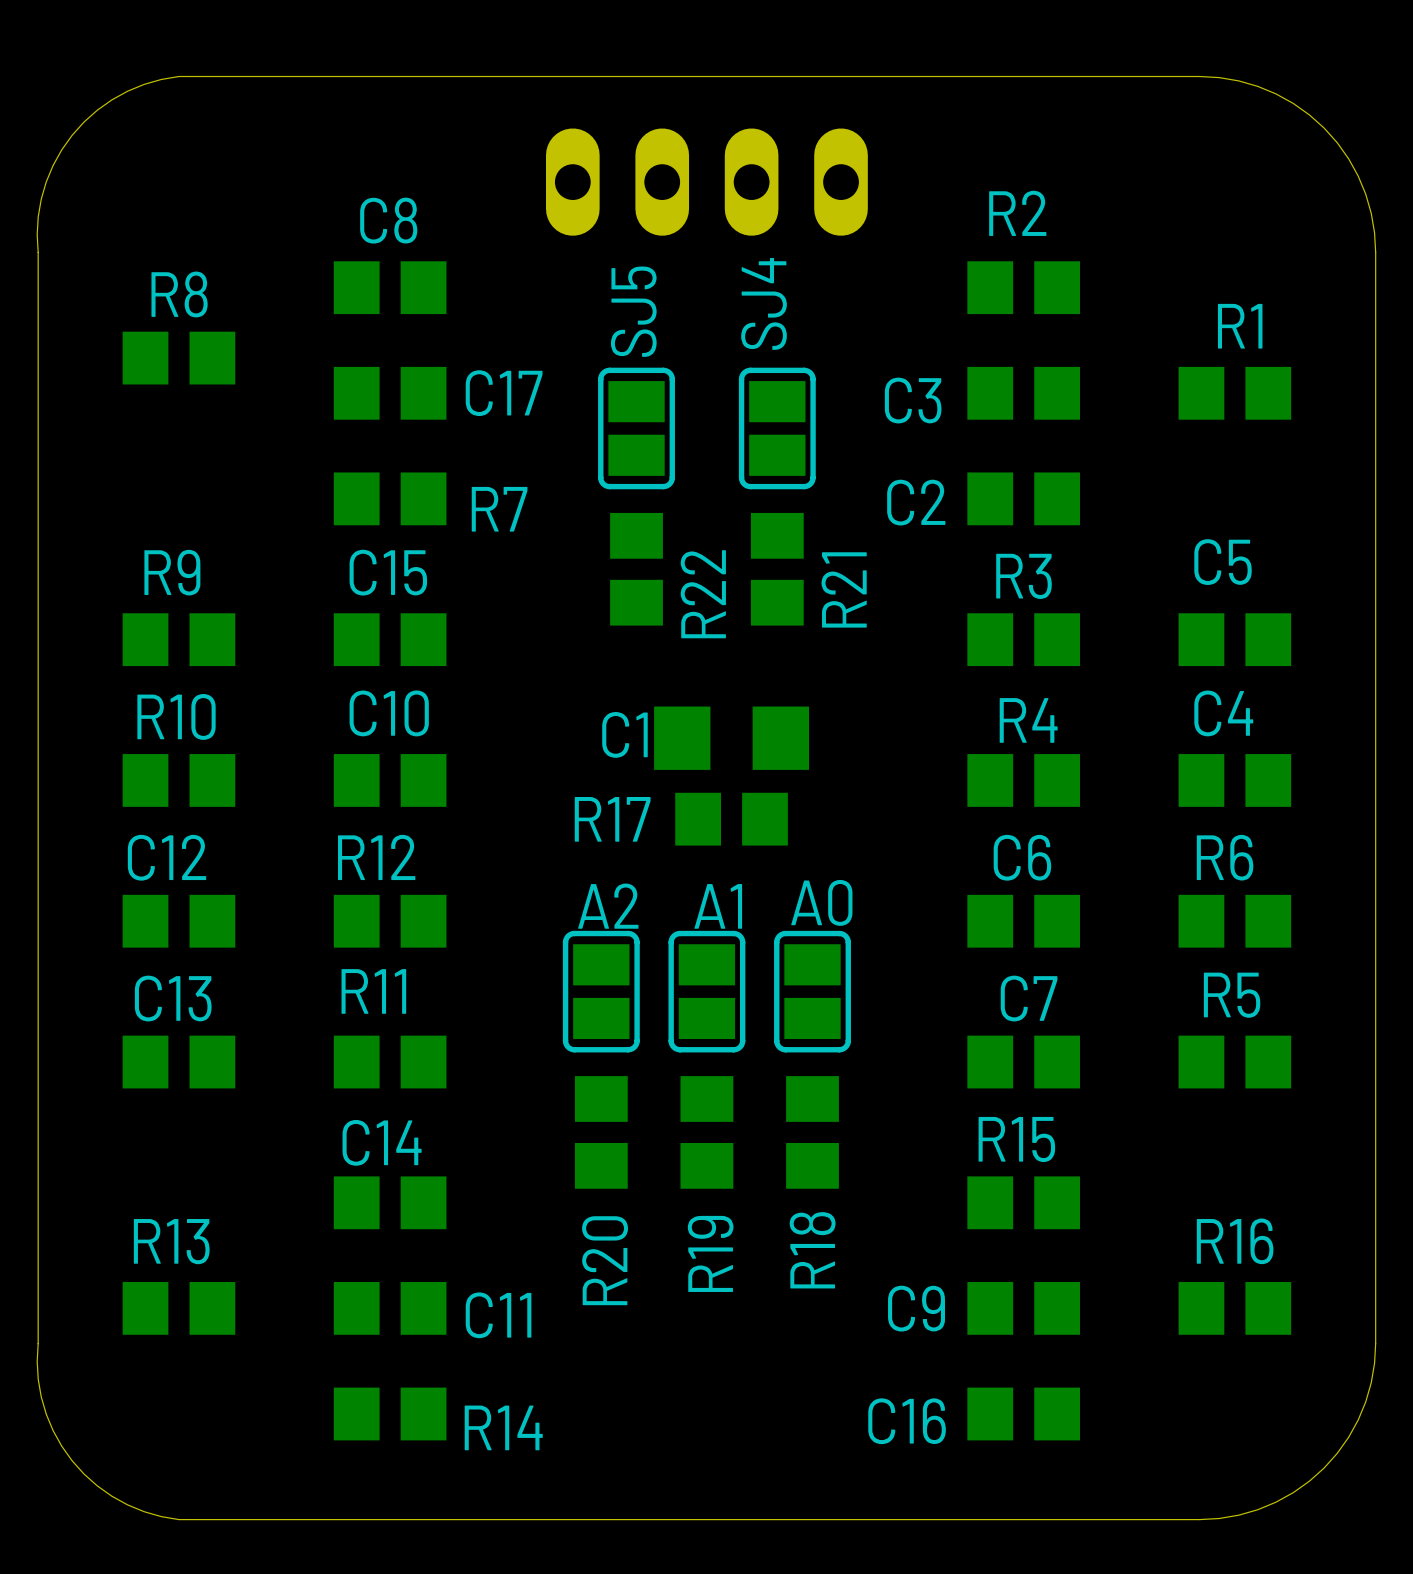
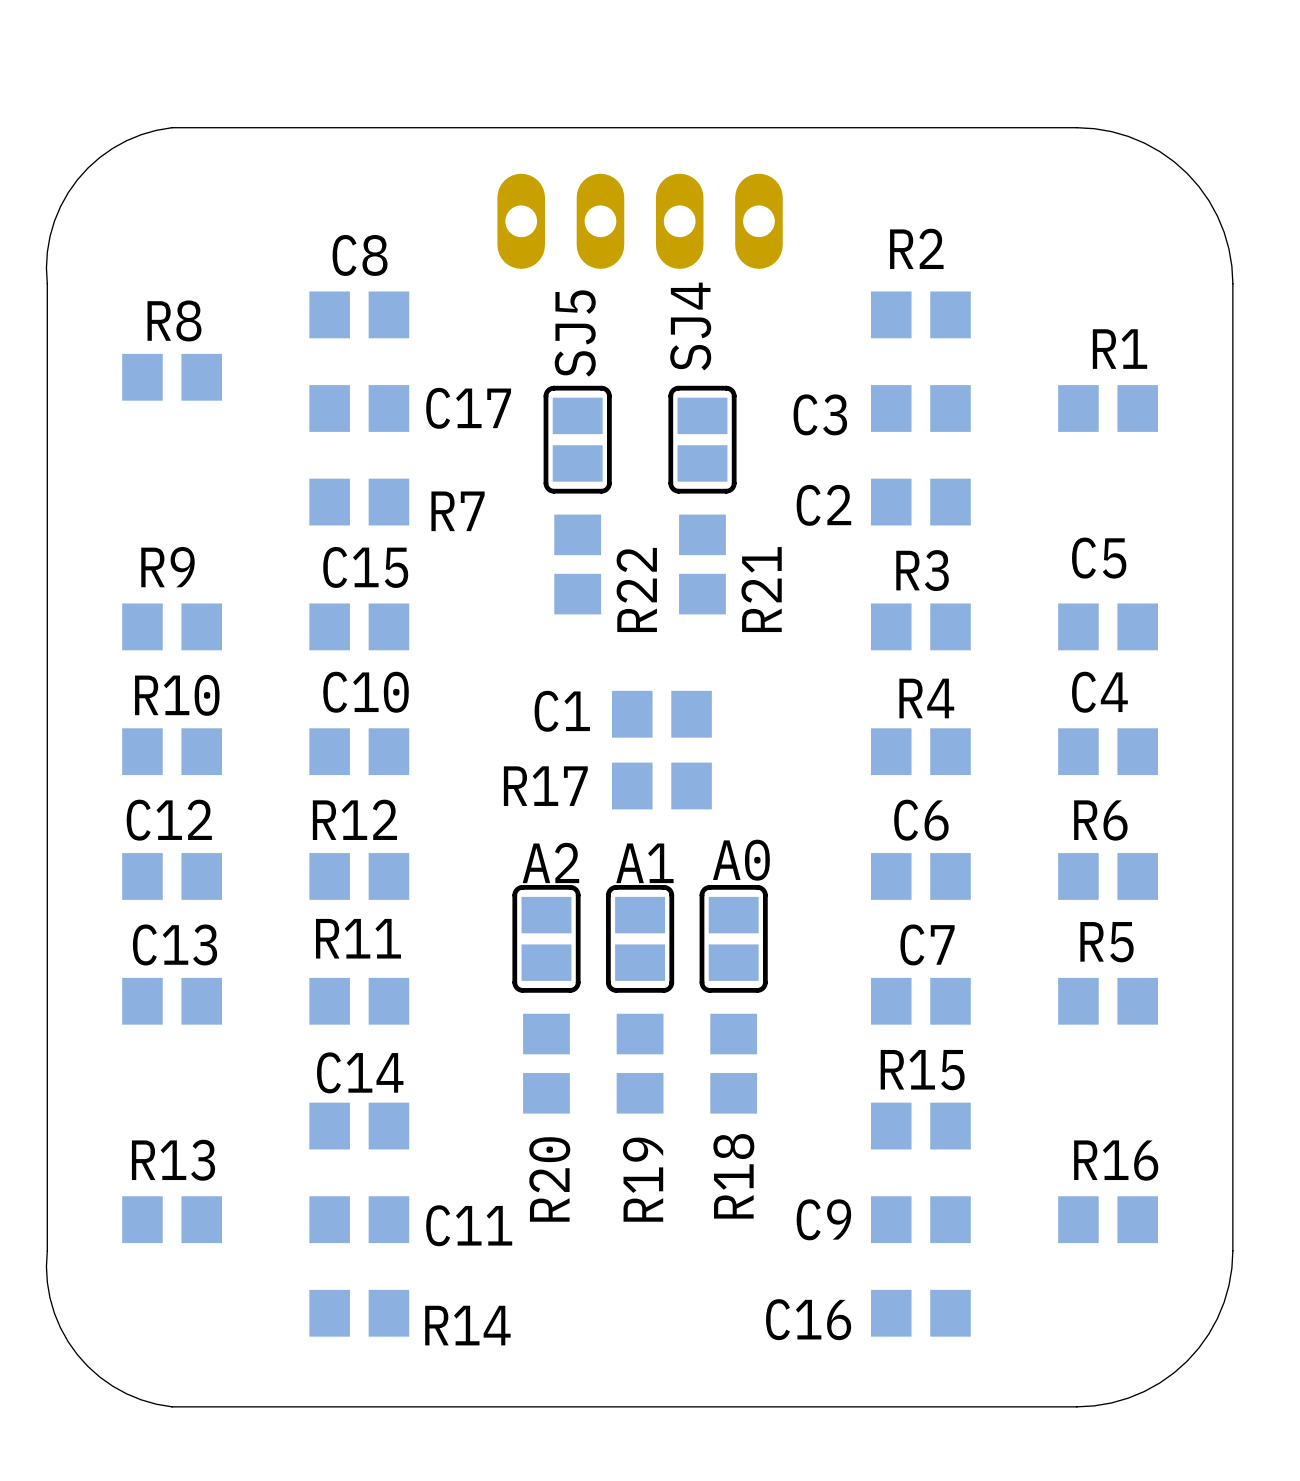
C1 footprint: [654, 706, 809, 770] -> [612, 690, 712, 738]

